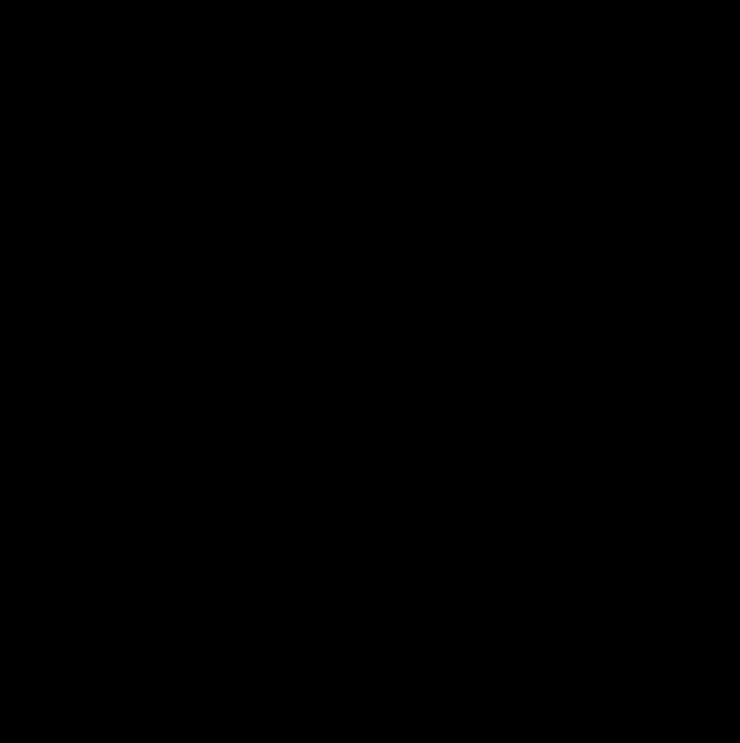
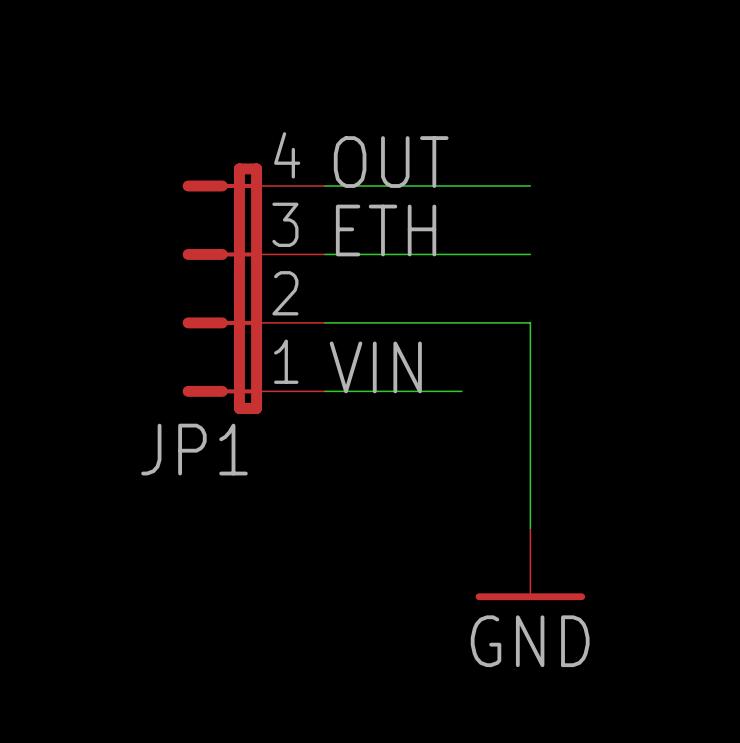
label: none -> OUT (391, 162)
wire: none -> (325, 186) (530, 186)
label: none -> ETH (386, 230)
wire: none -> (325, 254) (530, 254)
JP1: none -> (253, 288)
wire: none -> (325, 322) (530, 322) (530, 528)
label: none -> VIN (375, 367)
wire: none -> (325, 391) (461, 391)
power symbol: none -> GND (530, 564)

